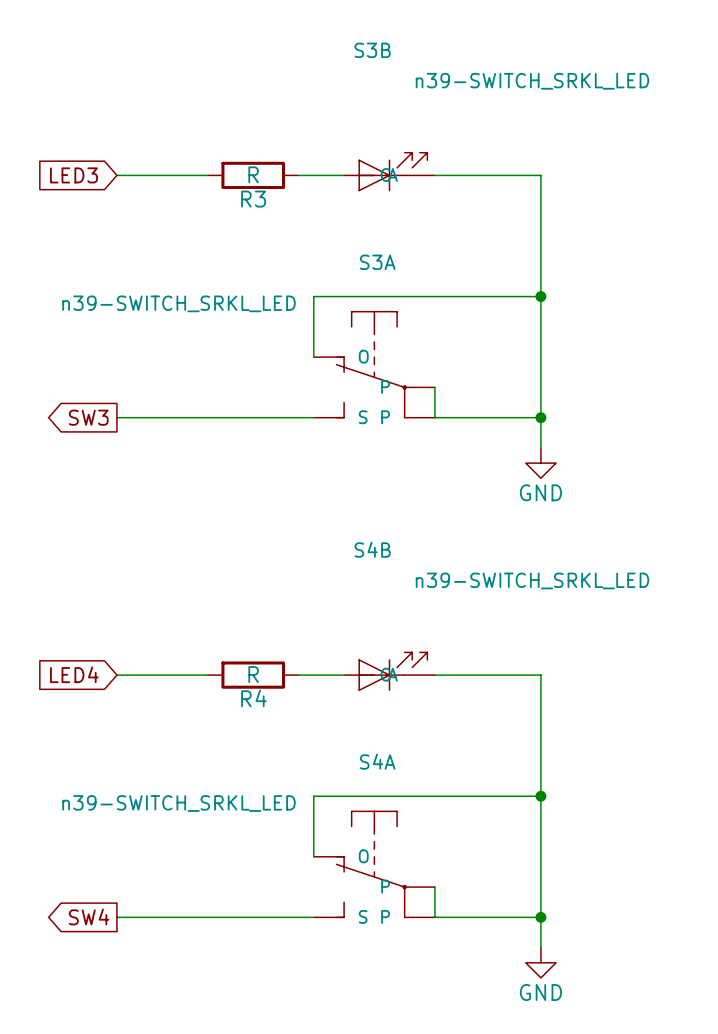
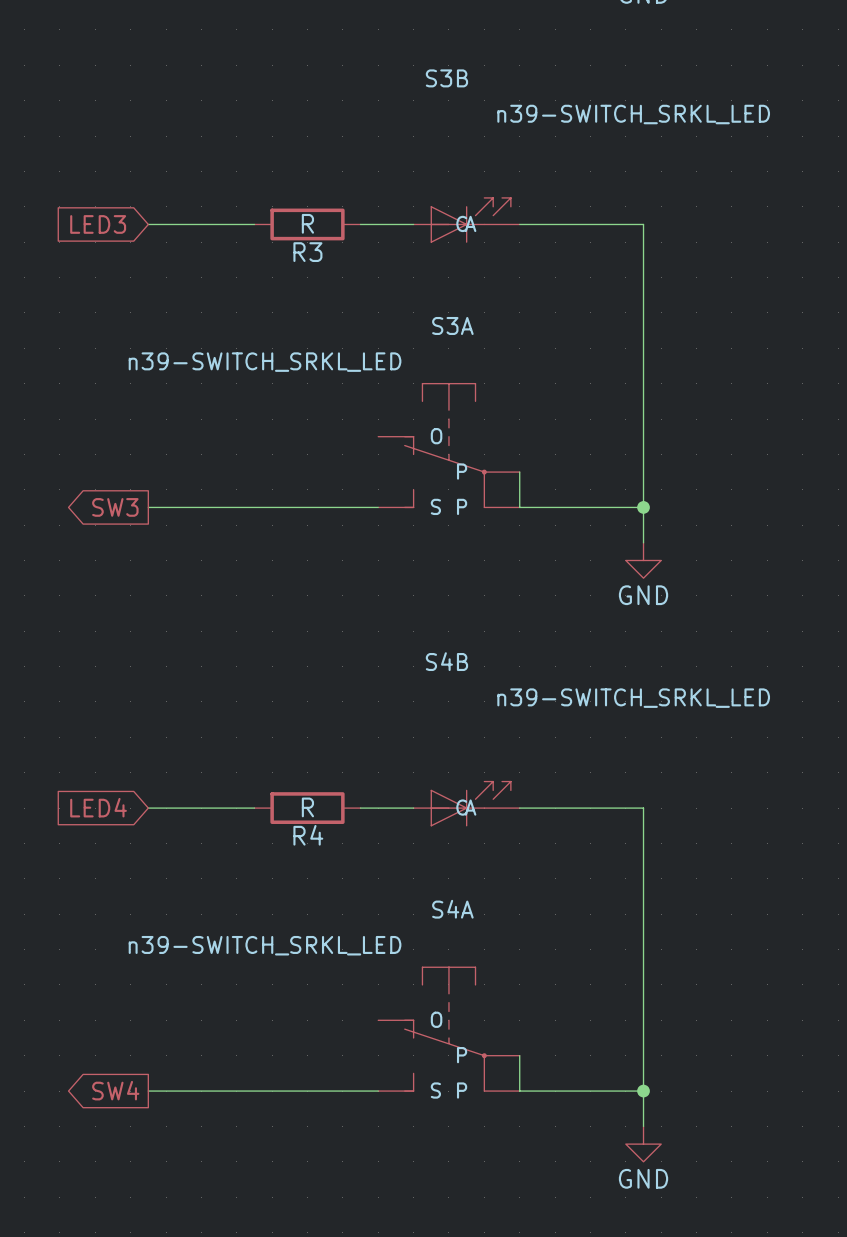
wire: (540, 296) (313, 296) (313, 357) -> none
junction: (540, 296) -> none
S3A value position: n39-SWITCH_SRKL_LED (179, 303) -> n39-SWITCH_SRKL_LED (265, 362)
wire: (540, 796) (313, 796) (313, 856) -> none
junction: (540, 796) -> none
S4A value position: n39-SWITCH_SRKL_LED (179, 803) -> n39-SWITCH_SRKL_LED (265, 945)

